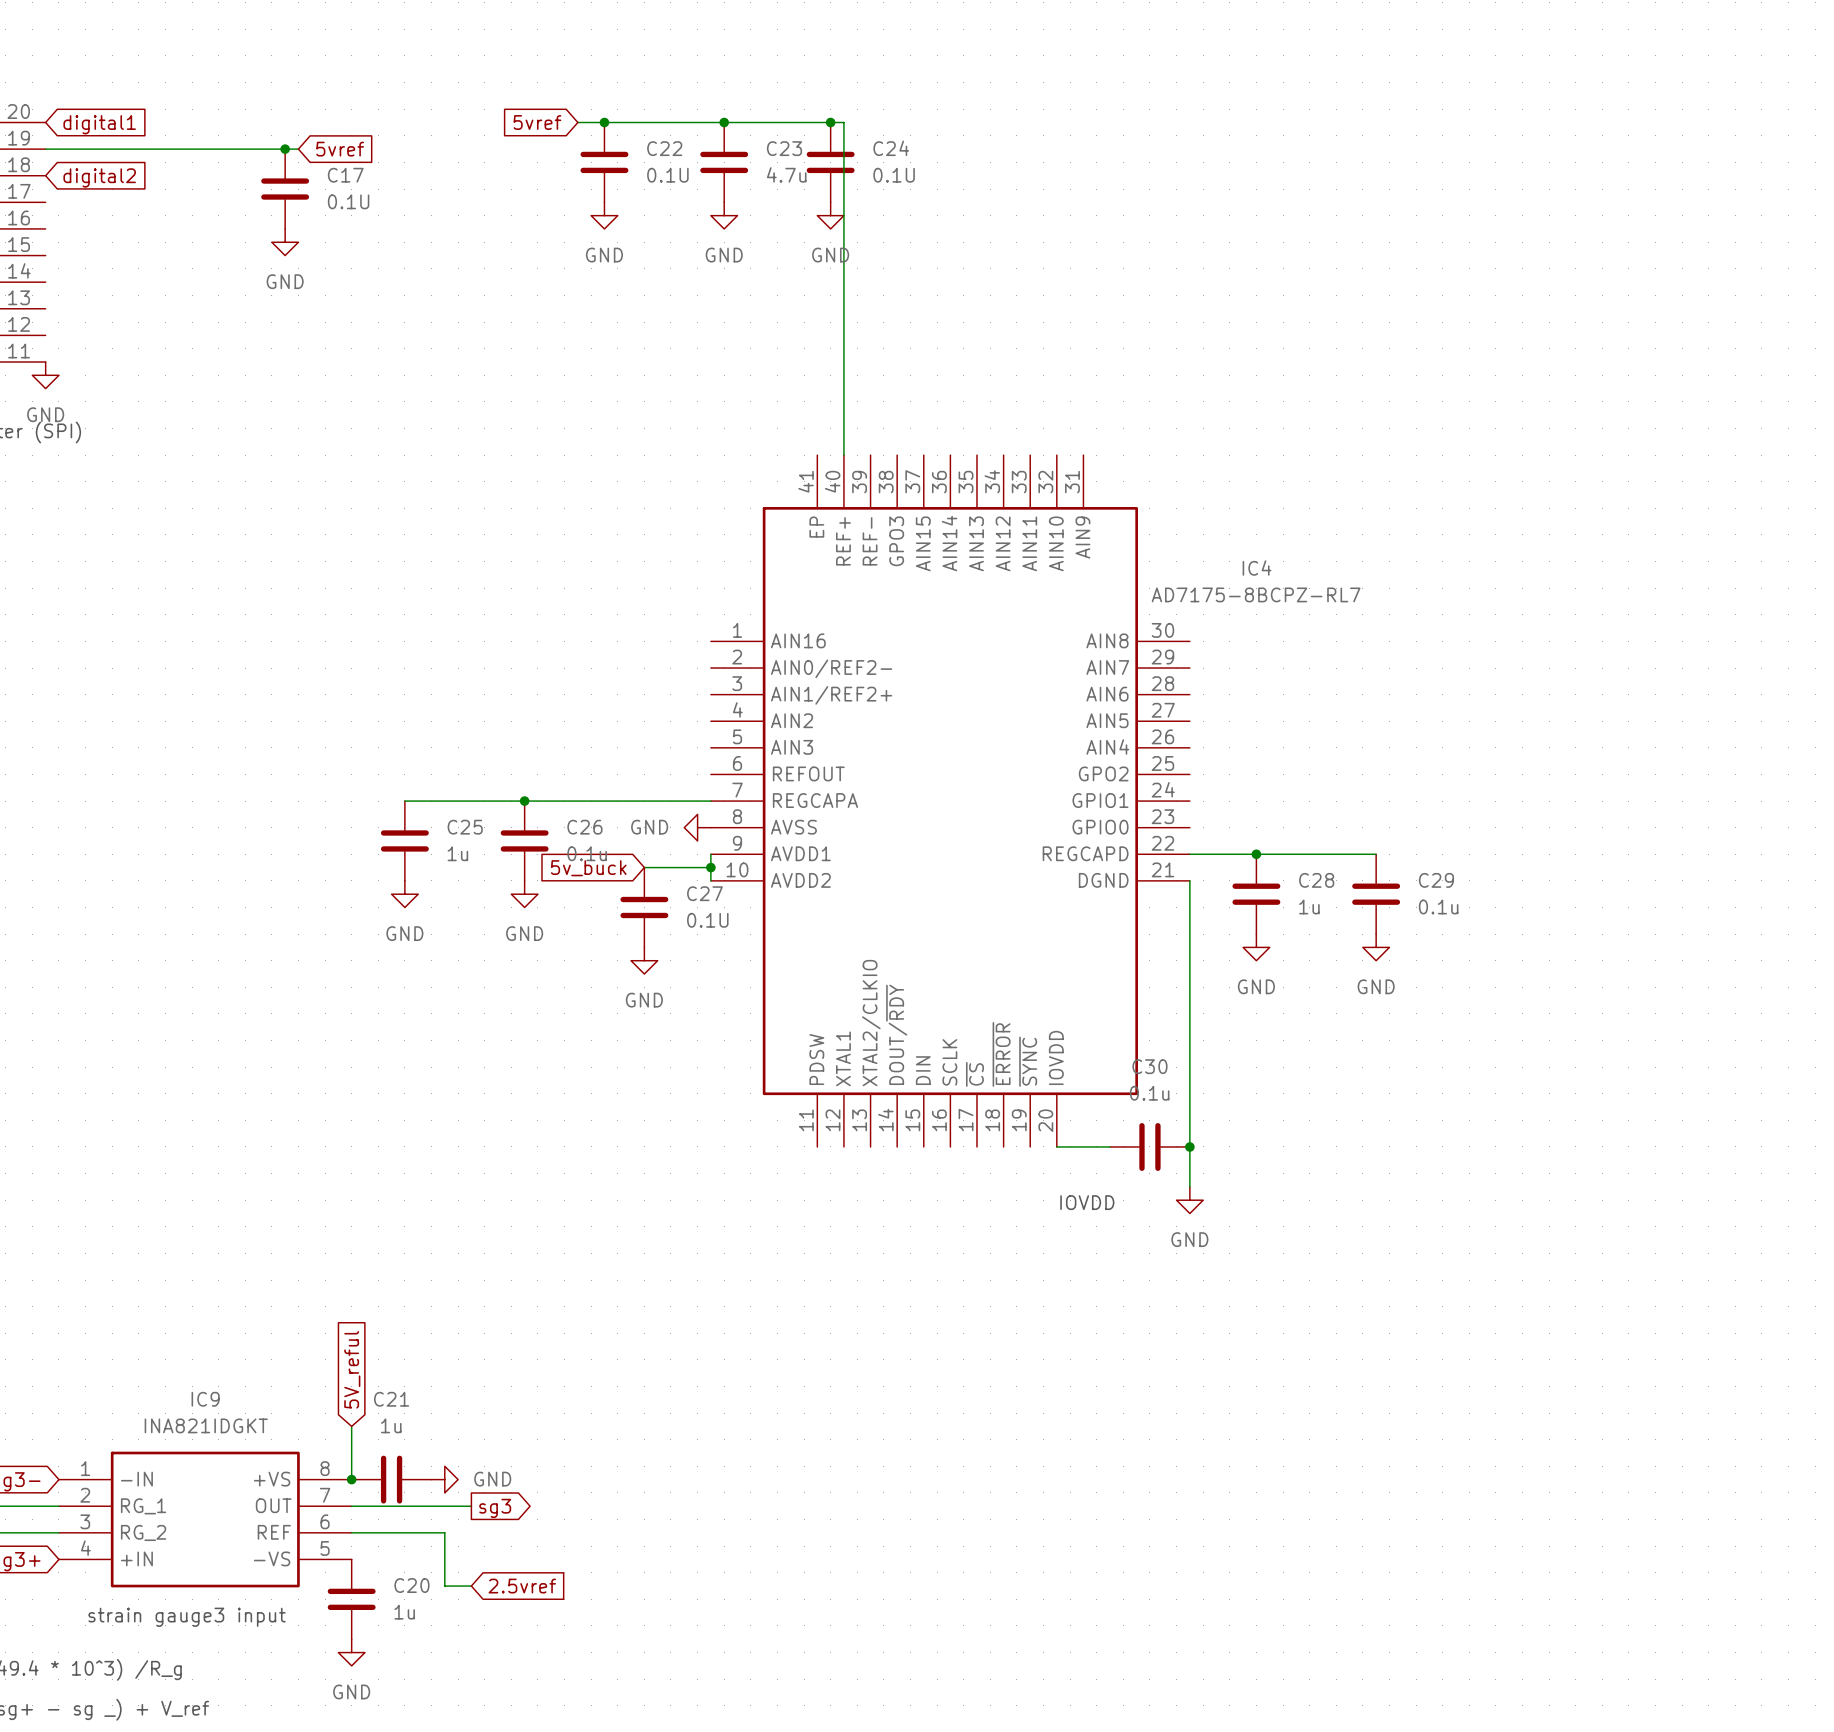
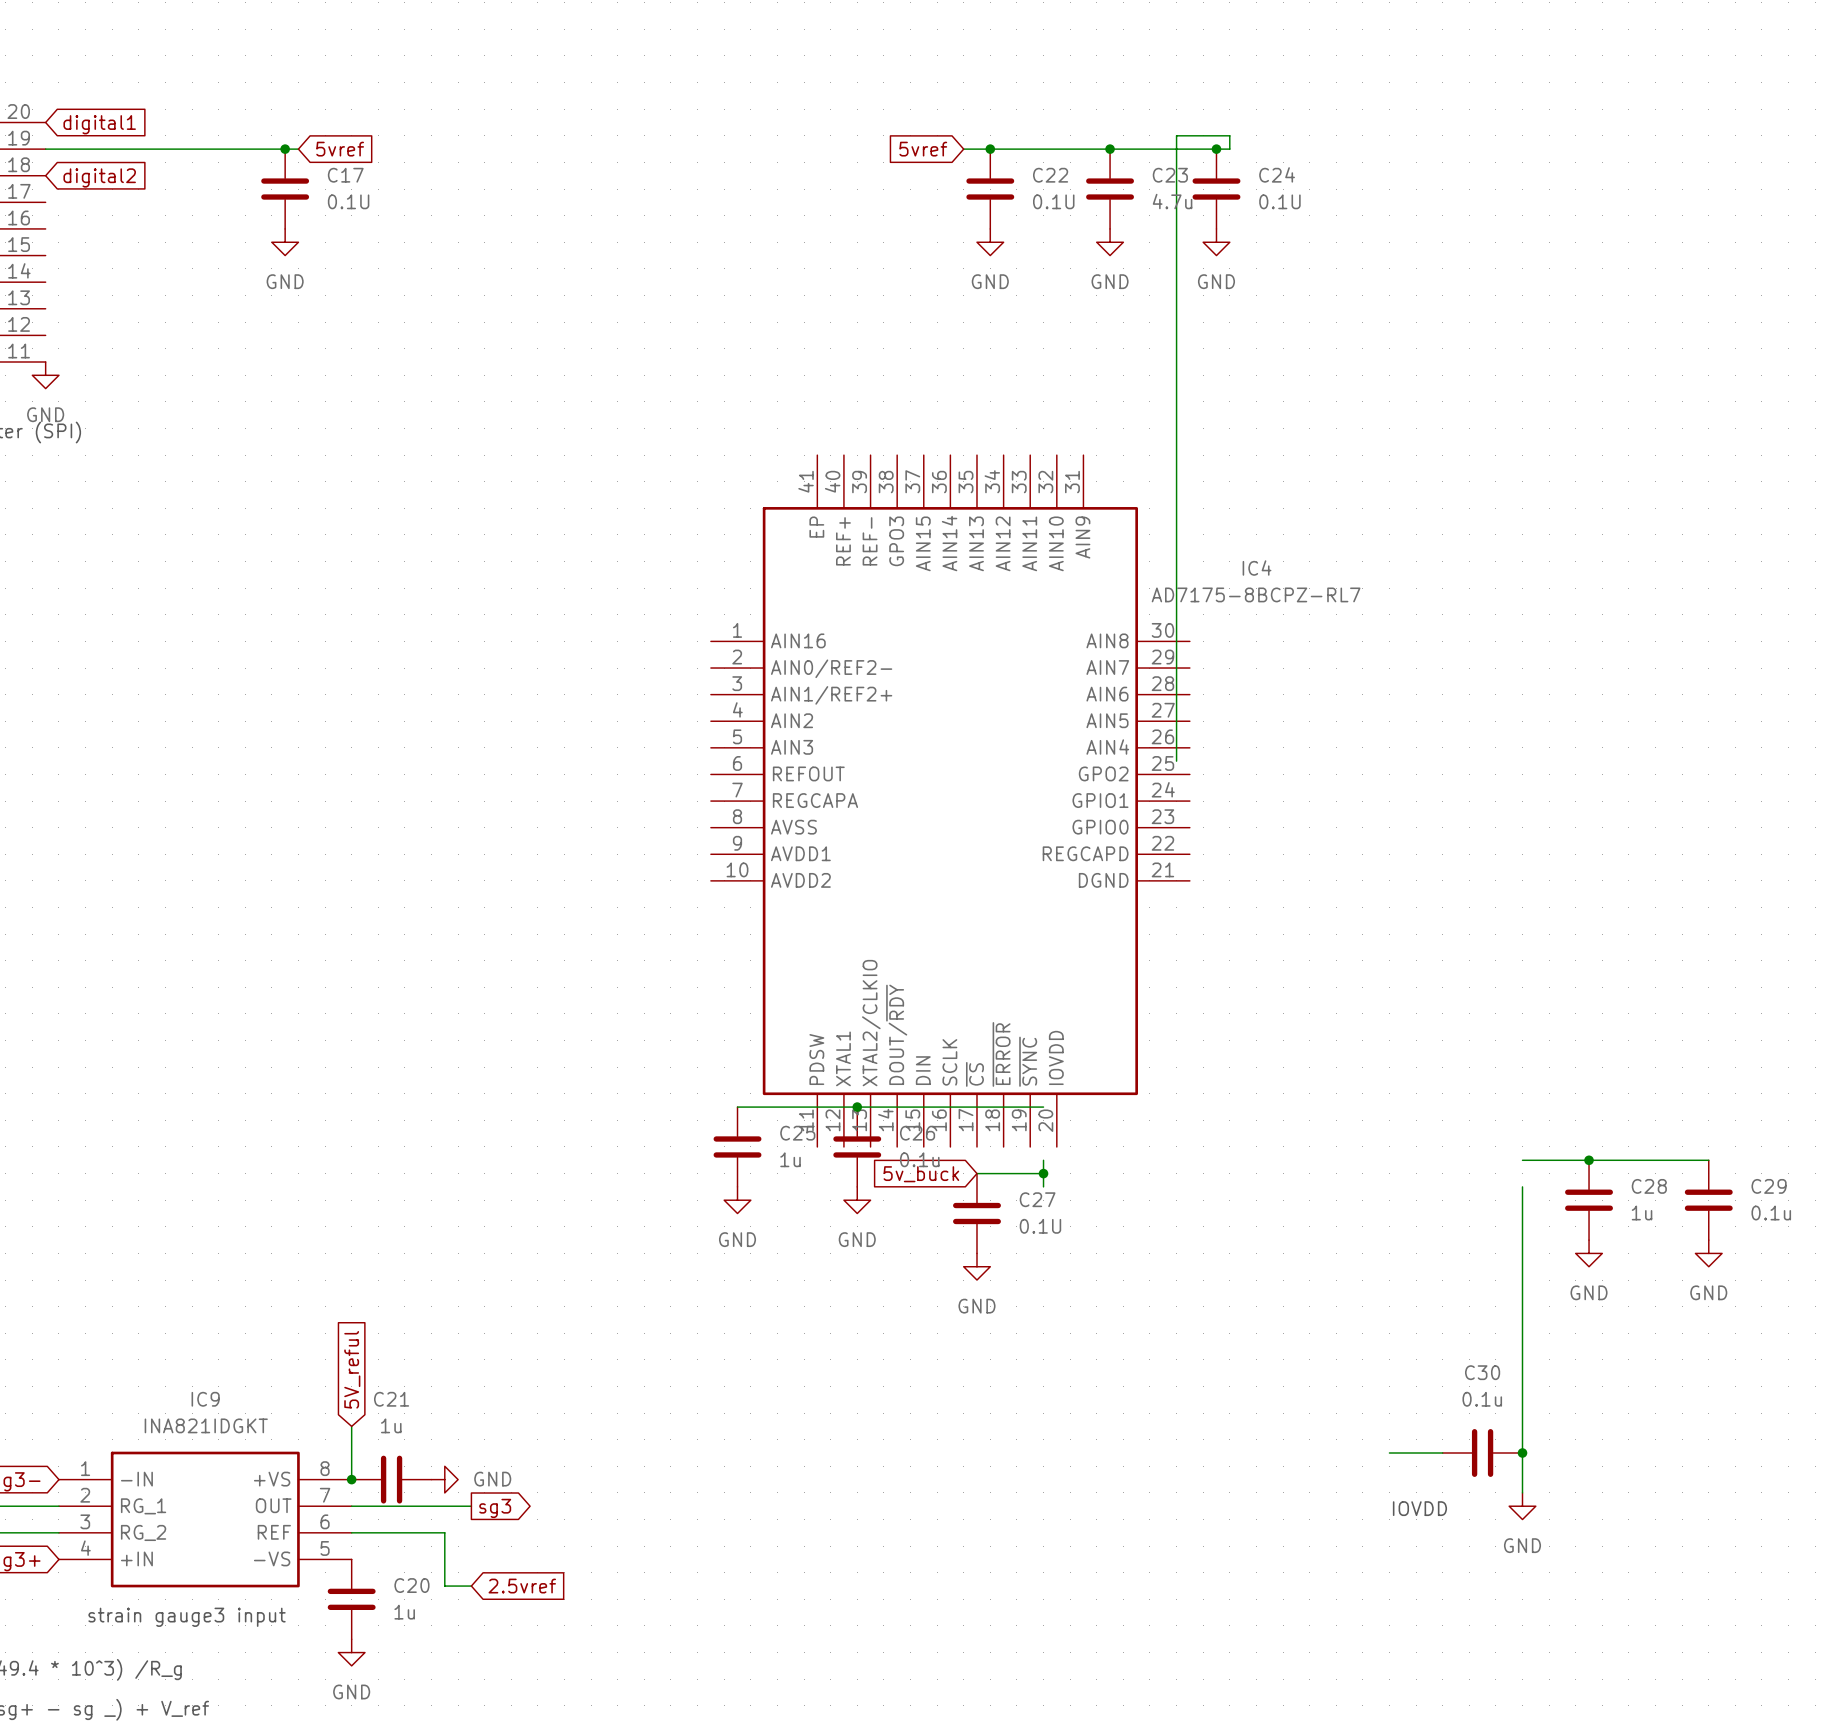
global label: 5vref (537, 122) -> none
wire: (577, 122) (843, 122) (843, 455) -> none
junction: (604, 122) -> none
junction: (724, 122) -> none
junction: (830, 122) -> none
global label: none -> 5vref (923, 149)
wire: none -> (963, 149) (1229, 149) (1229, 135) (1176, 135) (1176, 761)
junction: none -> (990, 149)
junction: none -> (1110, 149)
junction: none -> (1216, 149)
C22 position: (604, 162) -> (990, 189)
C23 position: (724, 162) -> (1110, 189)
C24 position: (830, 162) -> (1216, 189)
power symbol: GND (604, 215) -> none
power symbol: GND (724, 215) -> none
power symbol: GND (830, 215) -> none
power symbol: none -> GND (990, 242)
power symbol: none -> GND (1110, 242)
power symbol: none -> GND (1216, 242)
wire: (404, 801) (710, 801) -> none
junction: (524, 801) -> none
power symbol: GND (697, 827) -> none
C25 position: (404, 840) -> (737, 1146)
C26 position: (524, 840) -> (857, 1146)
wire: (710, 854) (710, 880) -> none
wire: (1189, 854) (1376, 854) -> none
junction: (1256, 854) -> none
wire: (644, 867) (710, 867) -> none
junction: (710, 867) -> none
global label: 5v_buck (588, 868) -> none
wire: (1189, 880) (1189, 1186) -> none
power symbol: GND (404, 894) -> none
power symbol: GND (524, 894) -> none
C28 position: (1256, 894) -> (1589, 1200)
C29 position: (1376, 894) -> (1708, 1200)
C27 position: (644, 907) -> (976, 1213)
power symbol: GND (1256, 947) -> none
power symbol: GND (1376, 947) -> none
power symbol: GND (644, 960) -> none
wire: none -> (737, 1107) (1043, 1107)
junction: none -> (857, 1107)
wire: (1056, 1146) (1110, 1146) -> none
C30 position: (1149, 1146) -> (1482, 1453)
junction: (1189, 1146) -> none
wire: none -> (1043, 1160) (1043, 1186)
wire: none -> (1522, 1160) (1708, 1160)
junction: none -> (1589, 1160)
wire: none -> (976, 1173) (1043, 1173)
junction: none -> (1043, 1173)
global label: none -> 5v_buck (921, 1174)
wire: none -> (1522, 1186) (1522, 1492)
power symbol: none -> GND (737, 1200)
power symbol: none -> GND (857, 1200)
power symbol: GND (1189, 1200) -> none
text: IOVDD (1087, 1202) -> none
power symbol: none -> GND (1589, 1253)
power symbol: none -> GND (1708, 1253)
power symbol: none -> GND (976, 1266)
wire: none -> (1389, 1453) (1442, 1453)
junction: none -> (1522, 1453)
power symbol: none -> GND (1522, 1506)
text: none -> IOVDD (1419, 1508)

